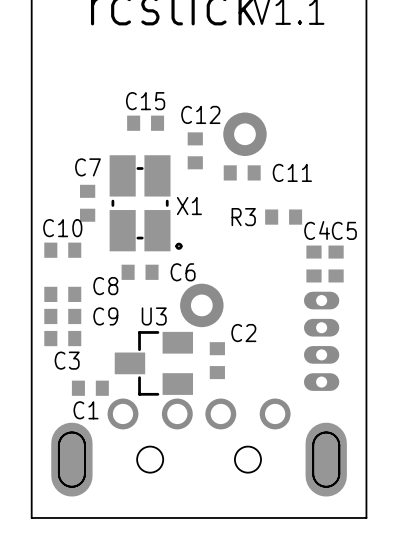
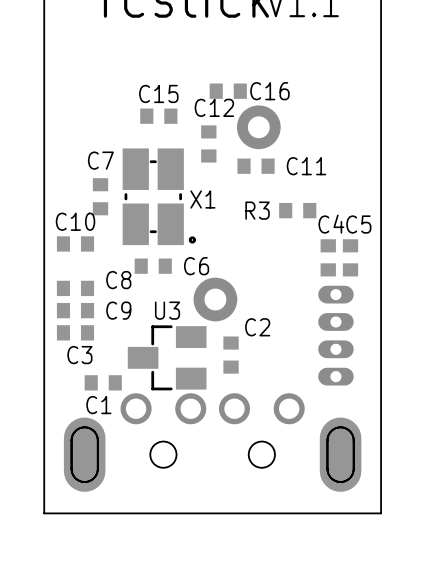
C16: none -> (228, 91)

